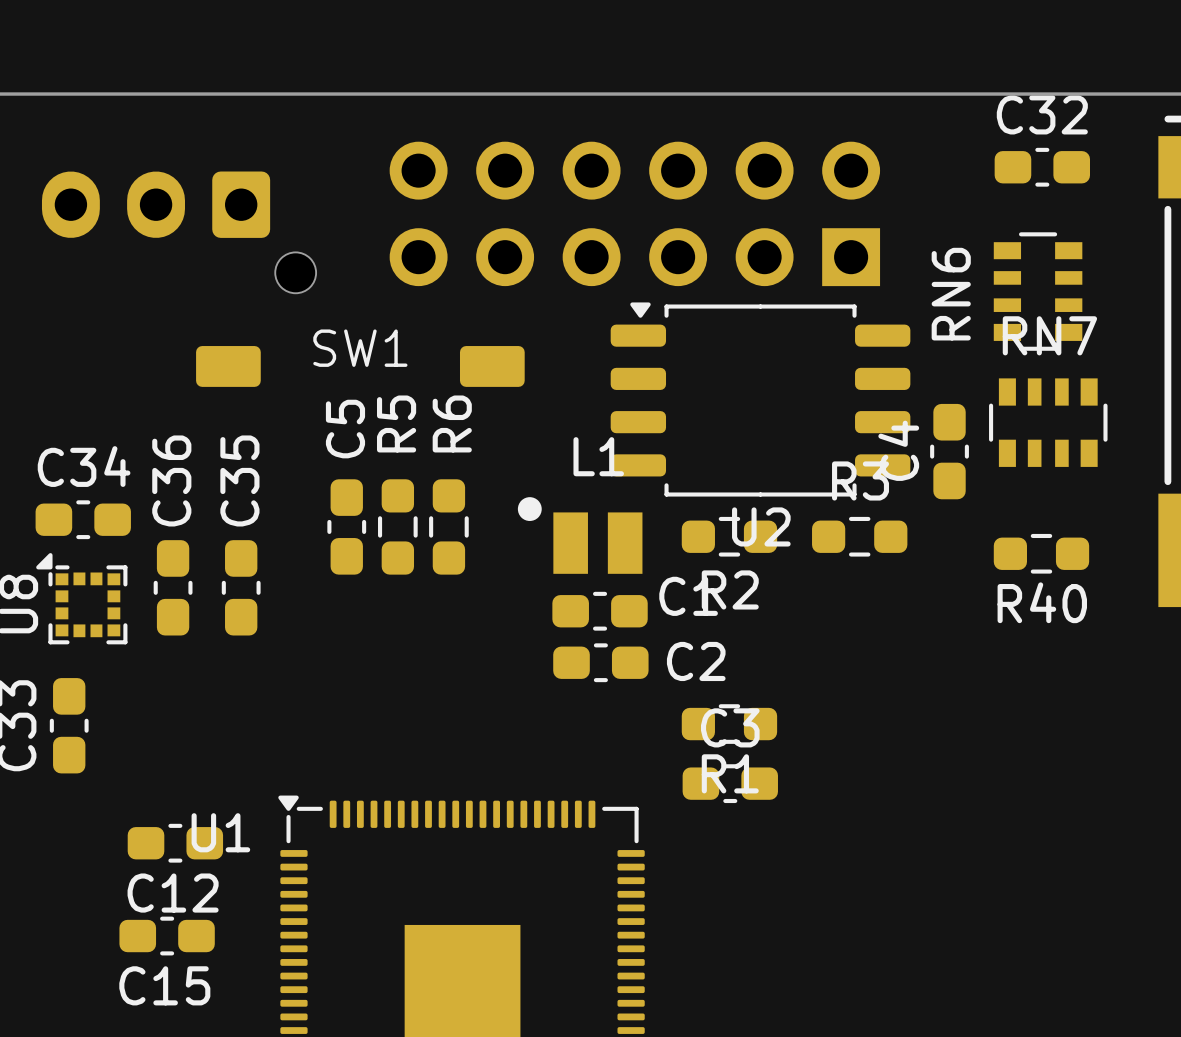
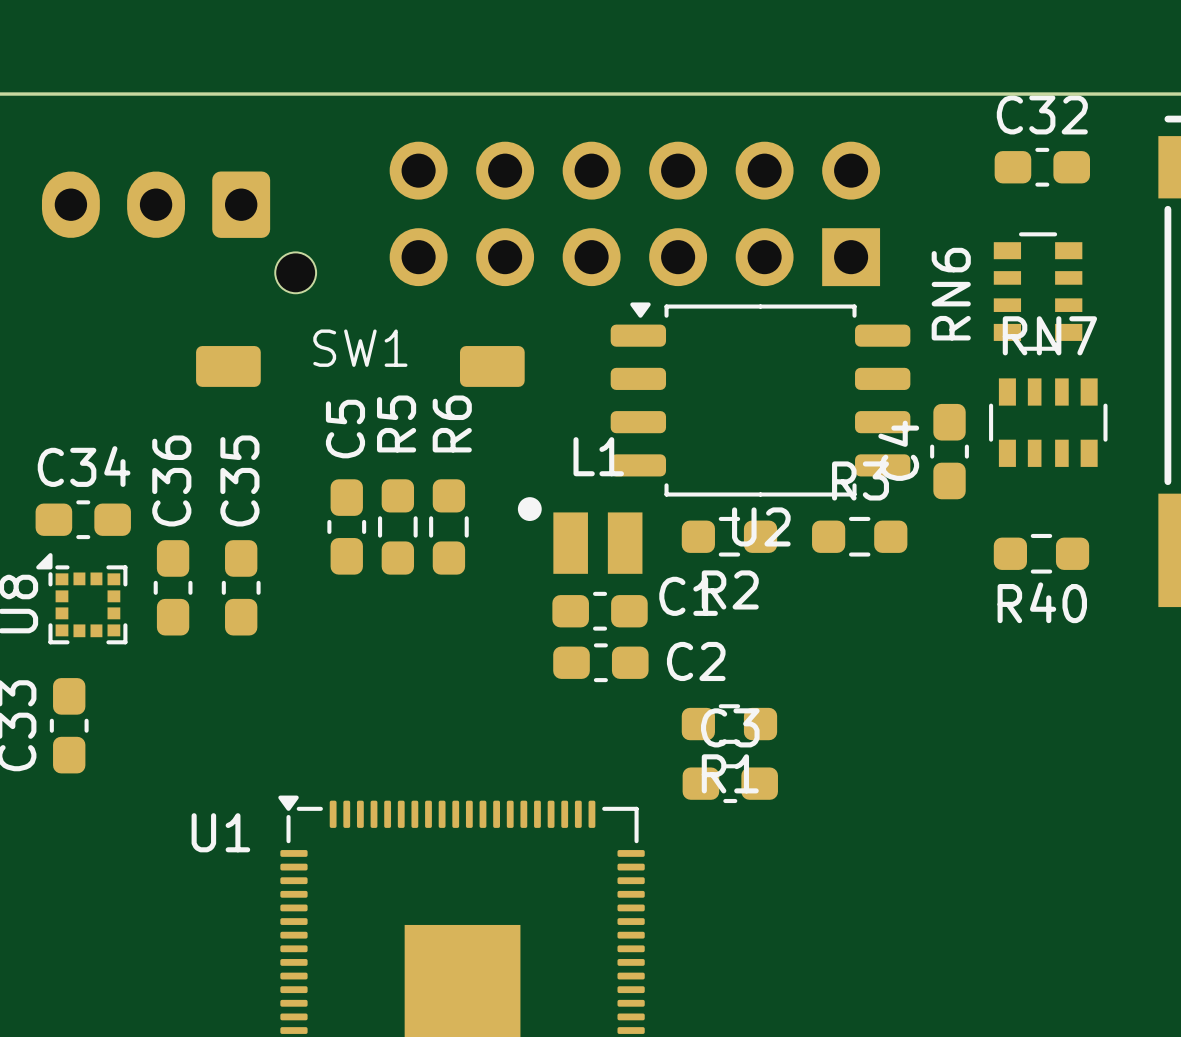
C12: (175, 843) -> none
C15: (167, 936) -> none

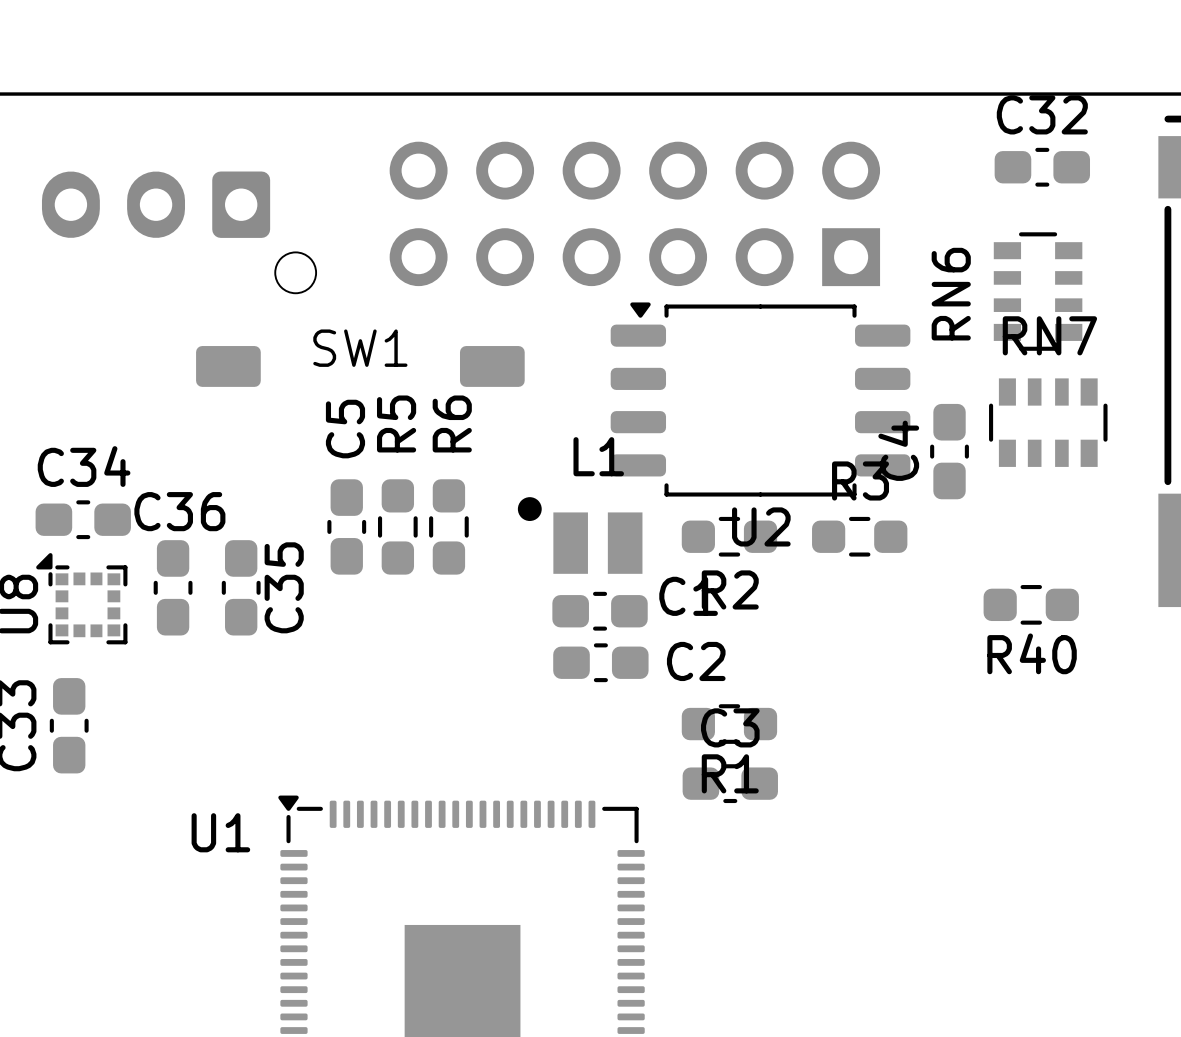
C36 name rotation: 0° (171, 480) -> 90° clockwise (179, 511)
C35 name position: C35 (239, 480) -> C35 (284, 587)
R40 position: (1041, 553) -> (1031, 604)

